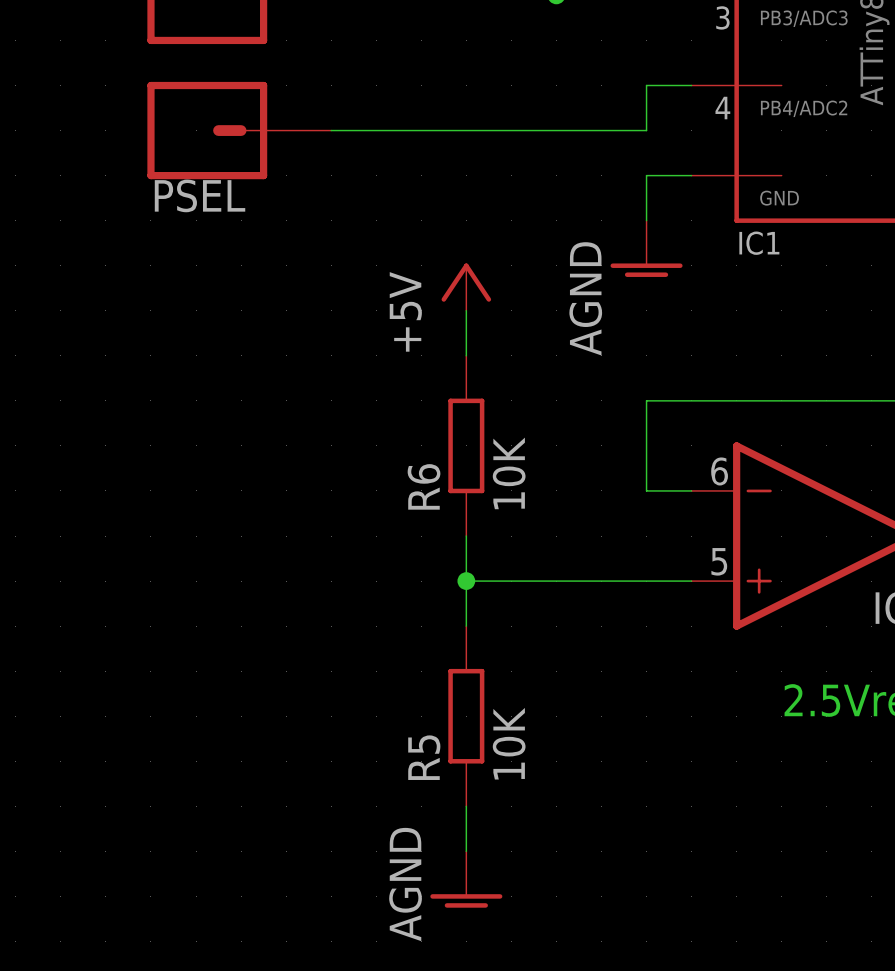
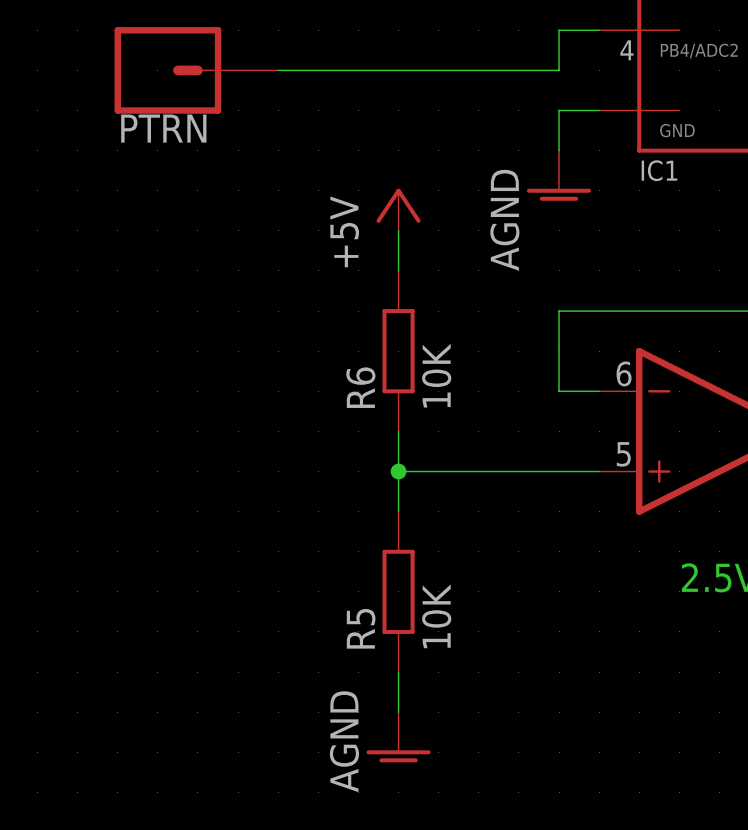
PSEL name: PSEL (200, 195) -> PTRN (163, 128)

